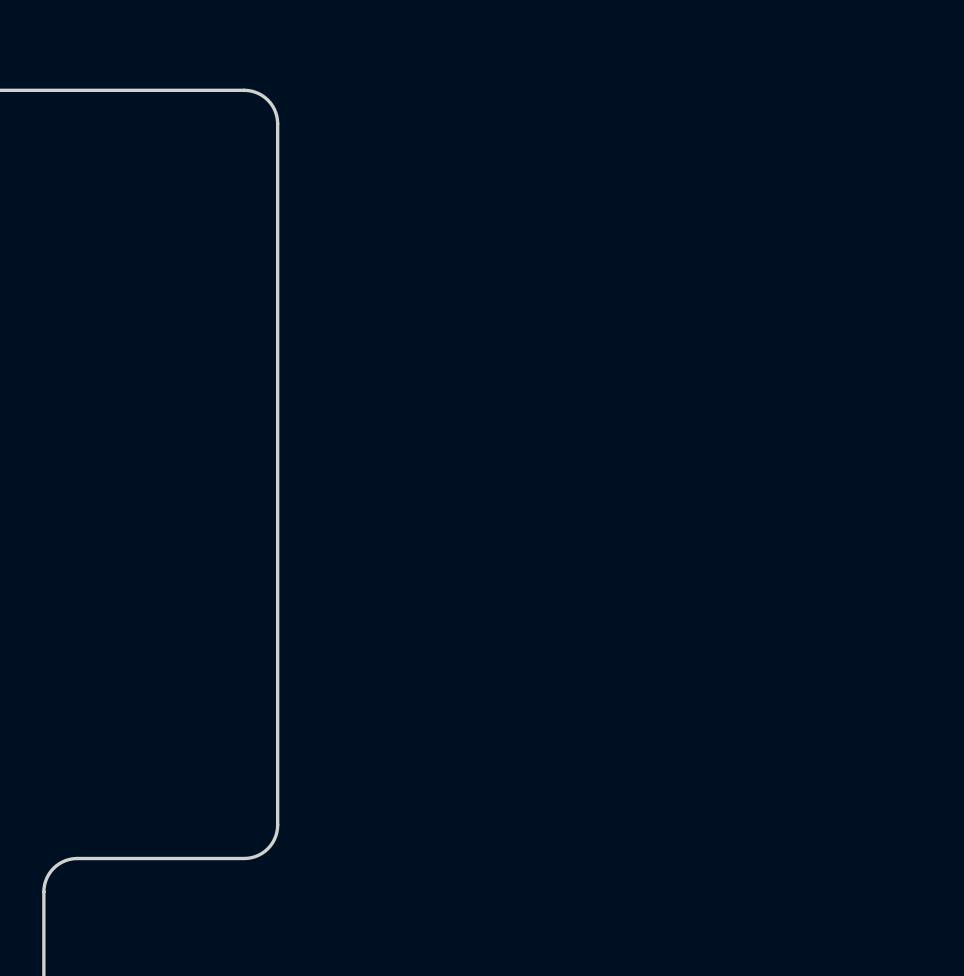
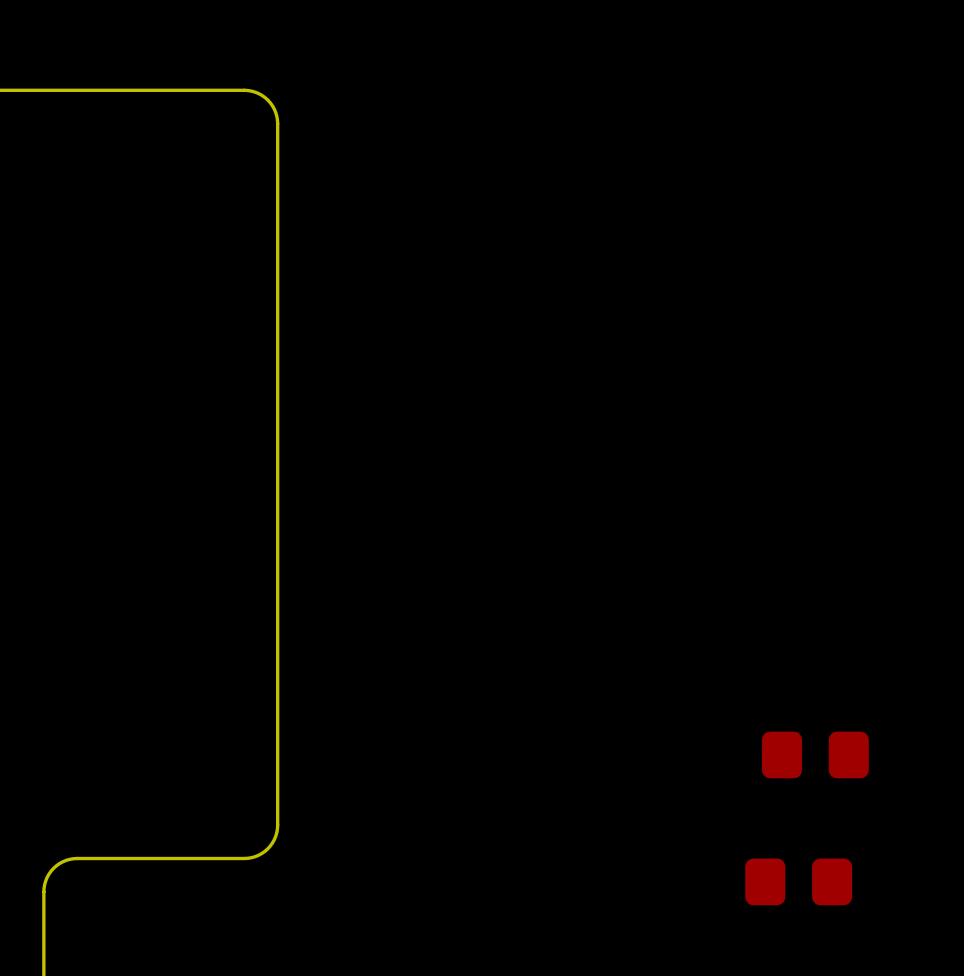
part: none -> (815, 754)
part: none -> (798, 881)

